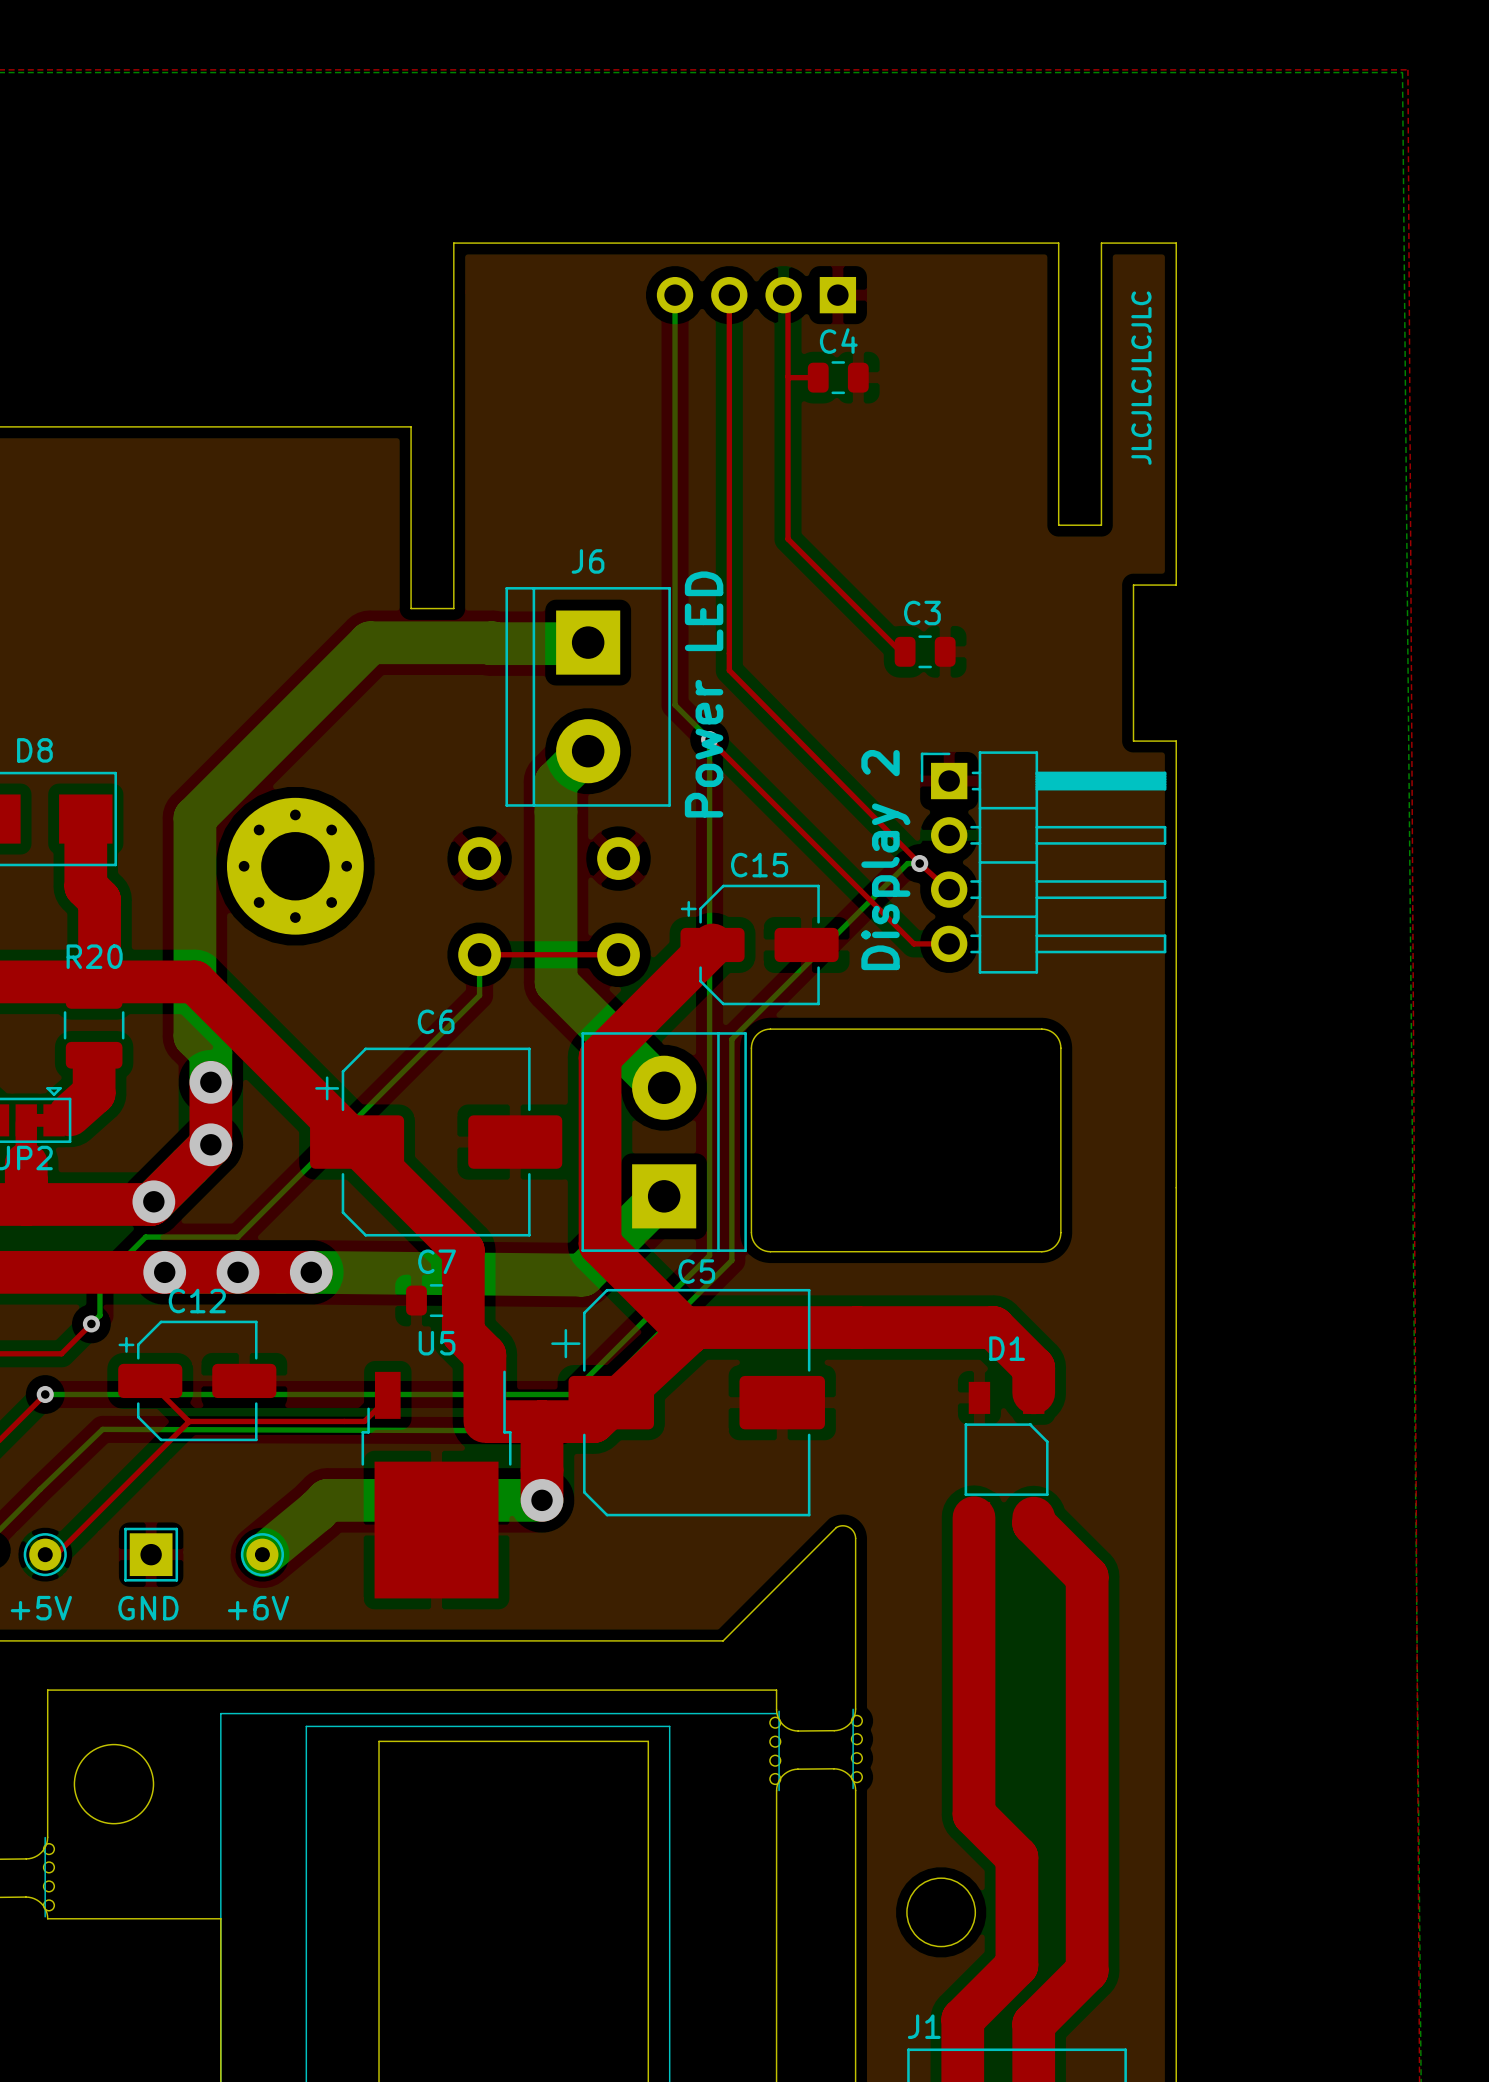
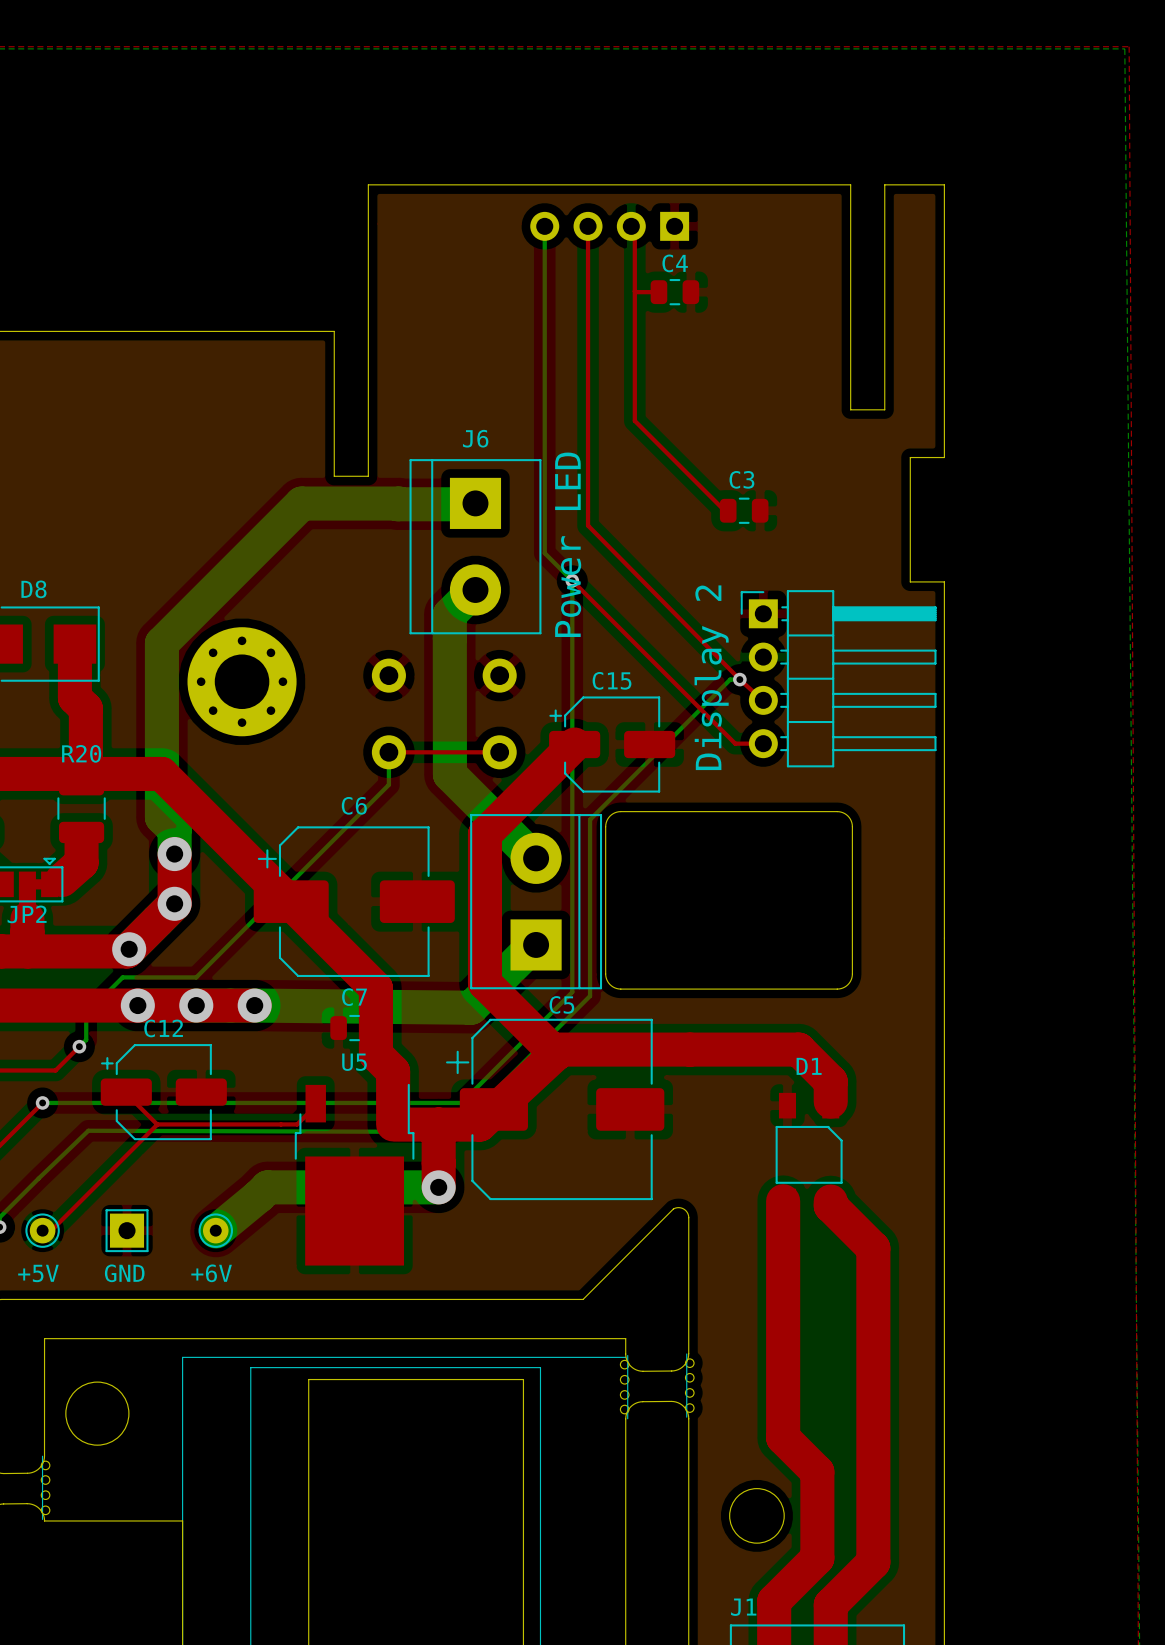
text: JLCJLCJLCJLC (1141, 378) -> none

